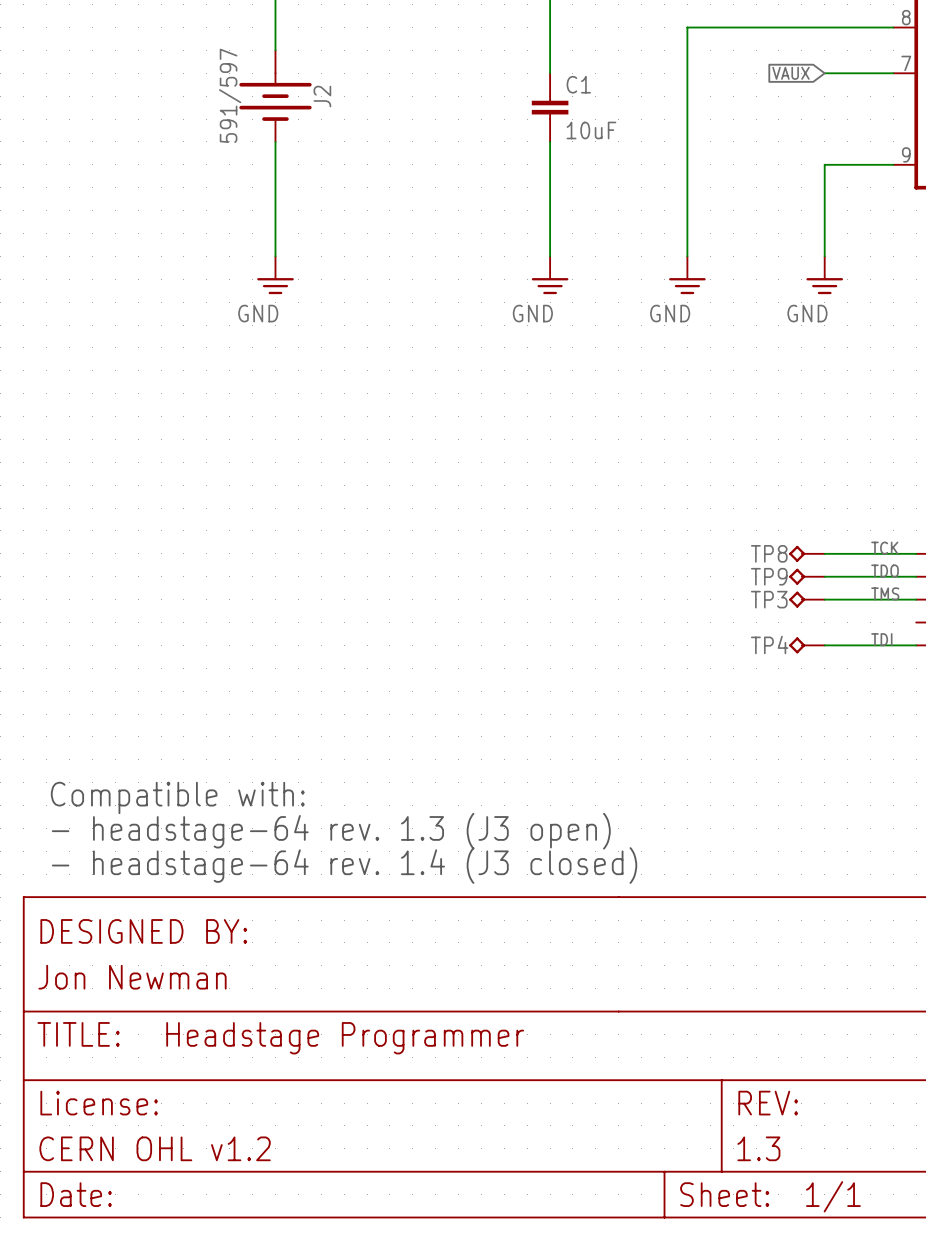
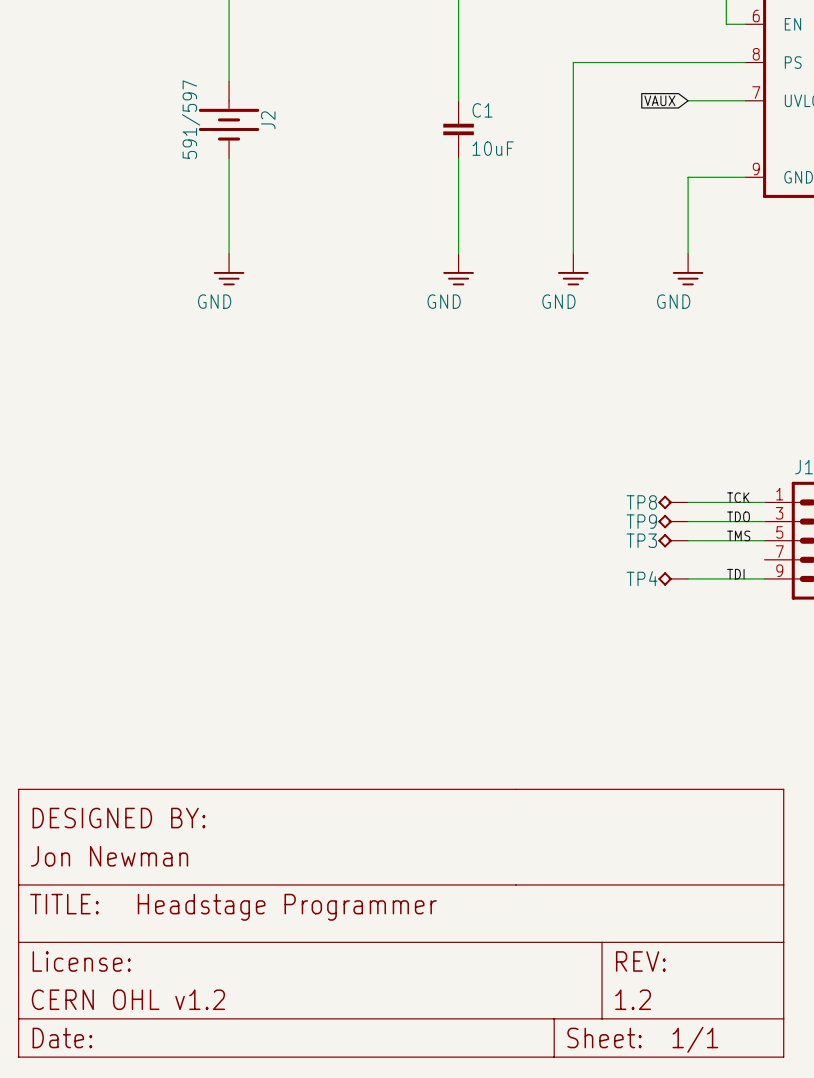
text: Compatible with: (177, 797) -> none
text: - headstage-64 rev. 1.3 (J3 open) (331, 831) -> none
text: - headstage-64 rev. 1.4 (J3 closed) (344, 865) -> none
part text: 1.3 (758, 1148) -> 1.2 (633, 999)

